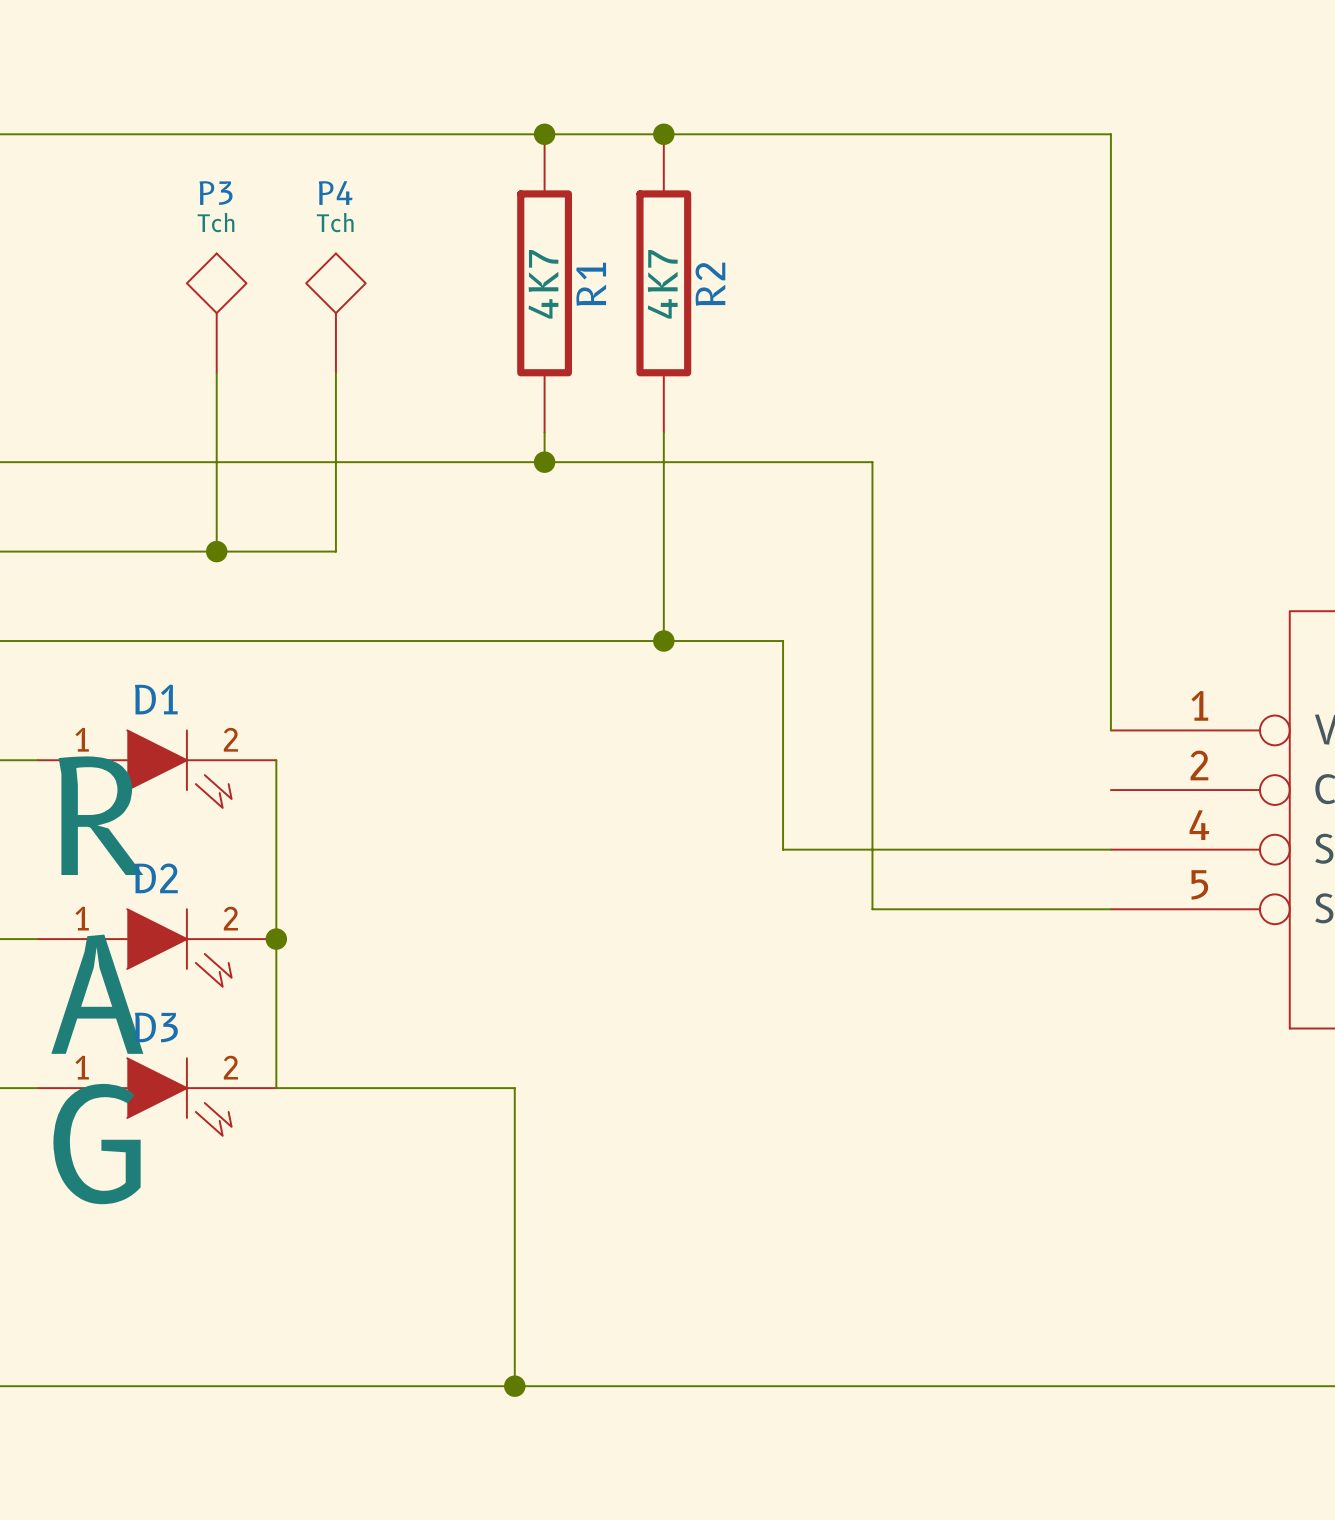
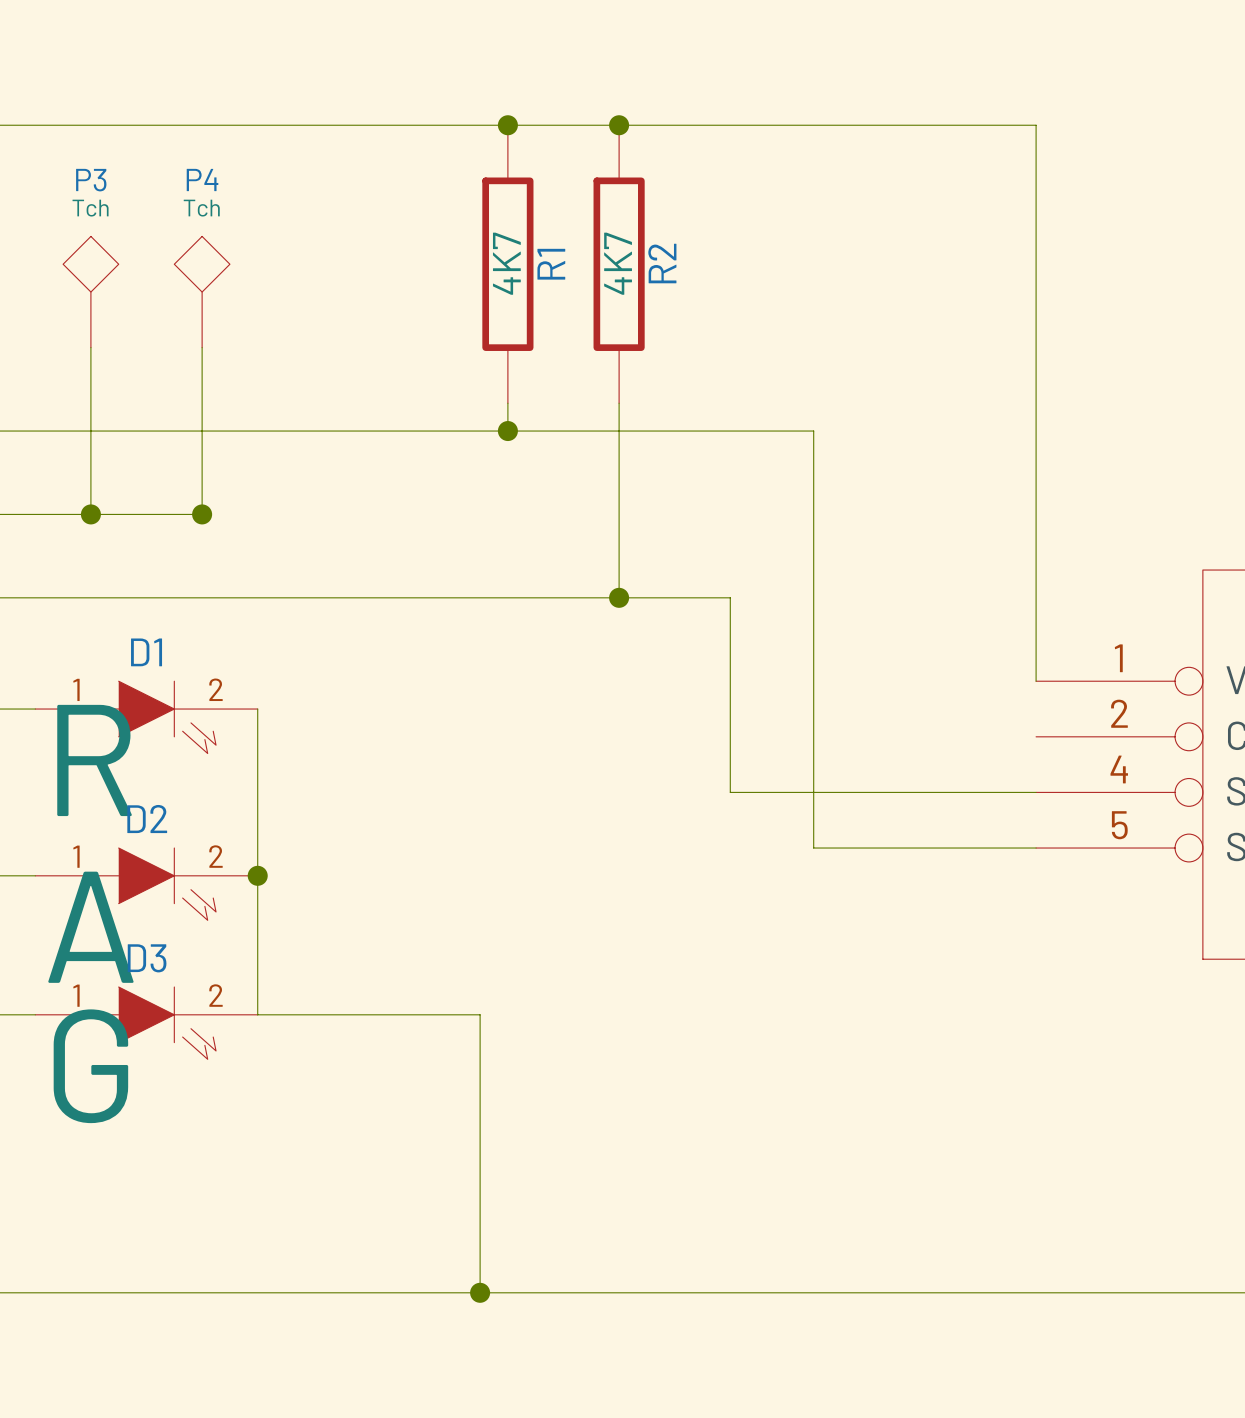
P3 name: P3 (216, 193) -> P4 (202, 179)
P3: none -> Tch (90, 292)
P4: Tch (335, 313) -> none
wire: none -> (90, 347) (90, 514)
wire: (335, 372) (335, 551) (216, 551) -> none
junction: none -> (90, 514)

